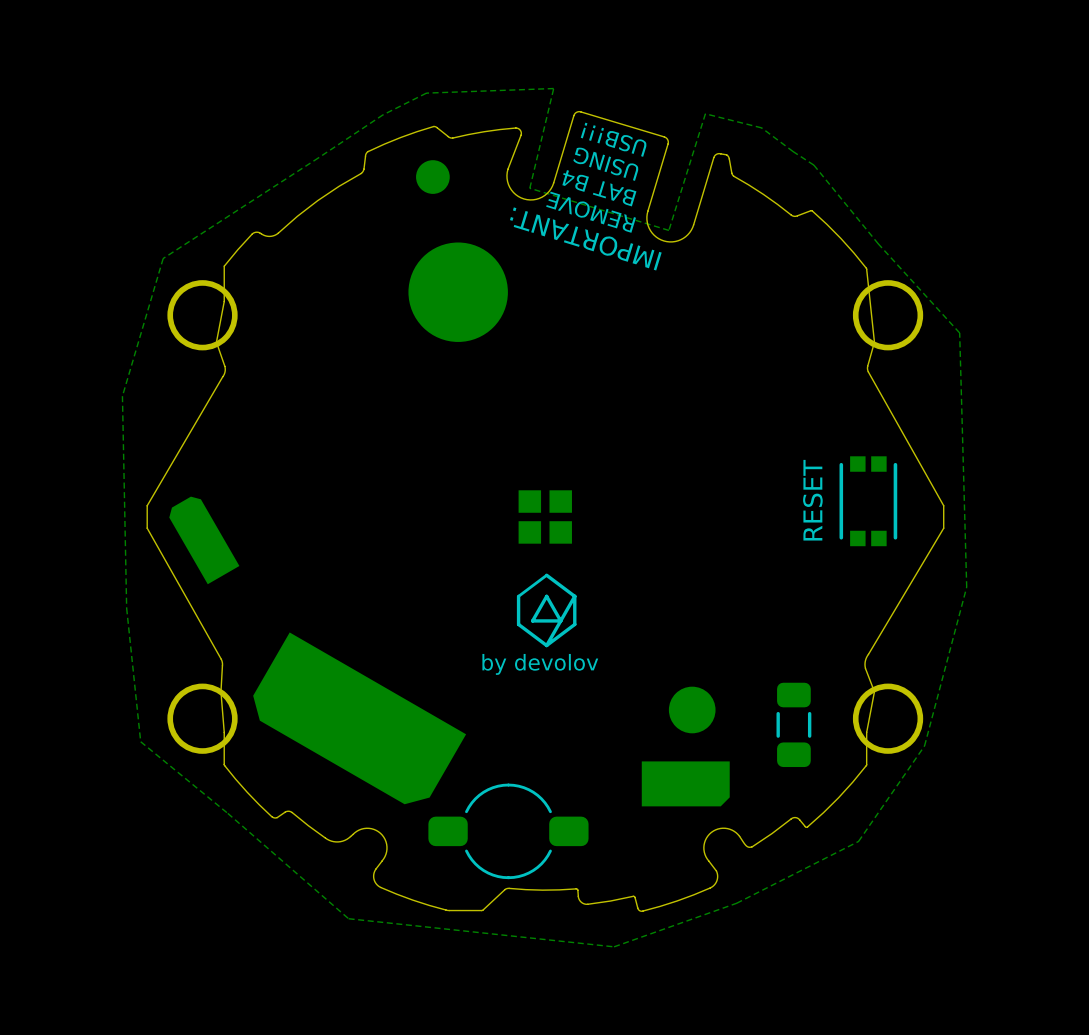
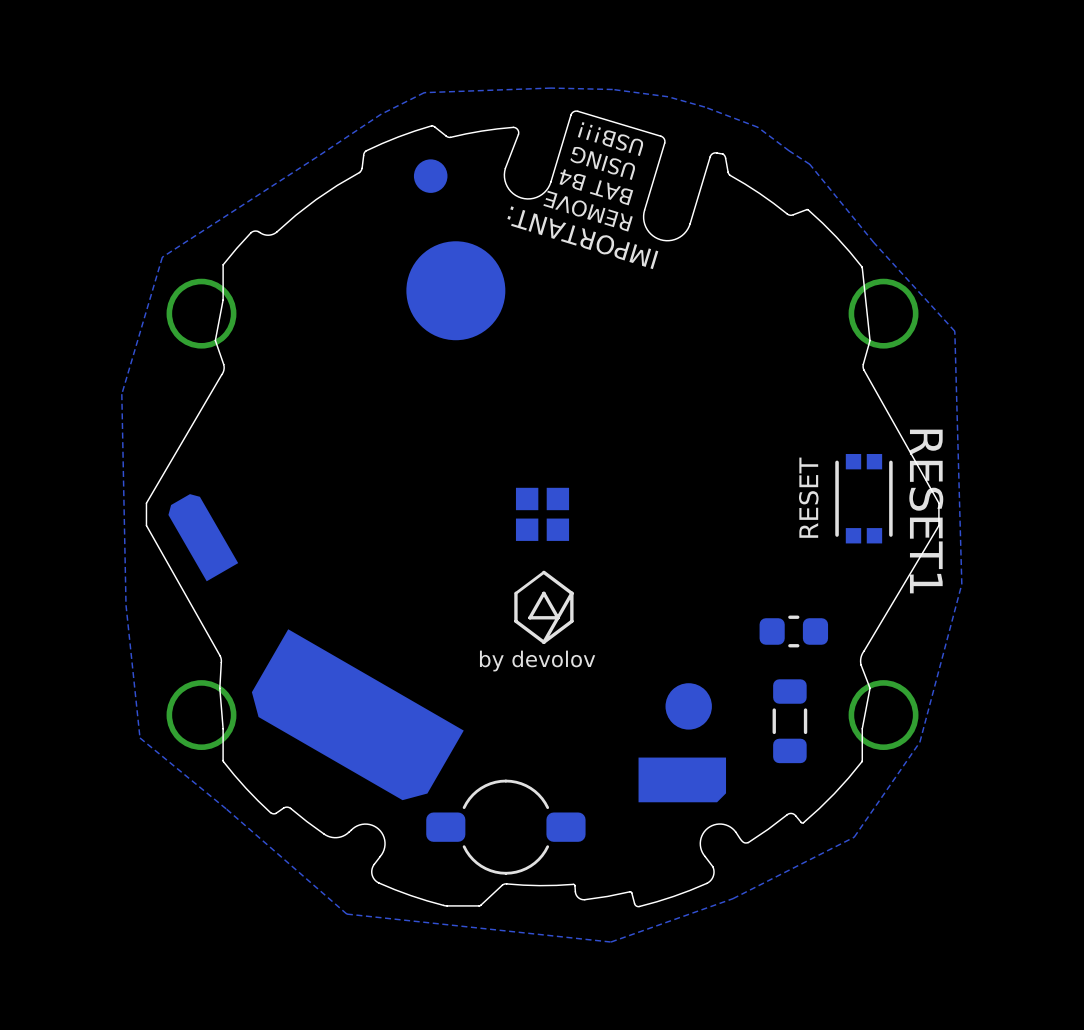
zone outline: (553, 88) (529, 188) (668, 230) (705, 113) (761, 127) -> (550, 88) (612, 89) (668, 96) (704, 107) (757, 127)
RESET1 name: none -> RESET1 (926, 511)
part: none -> (793, 631)

